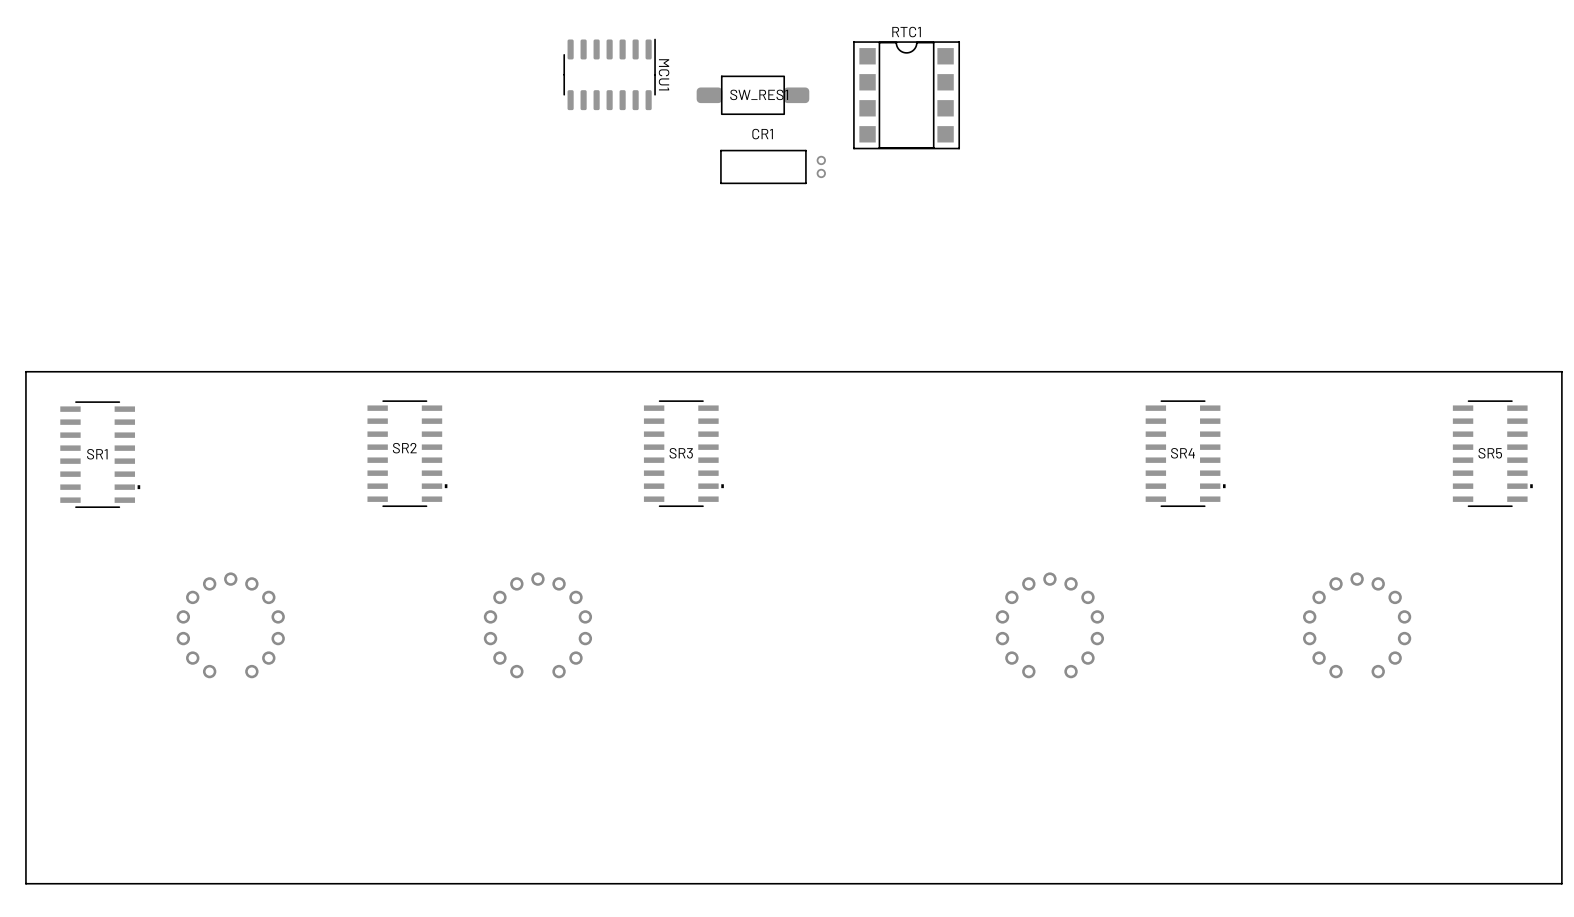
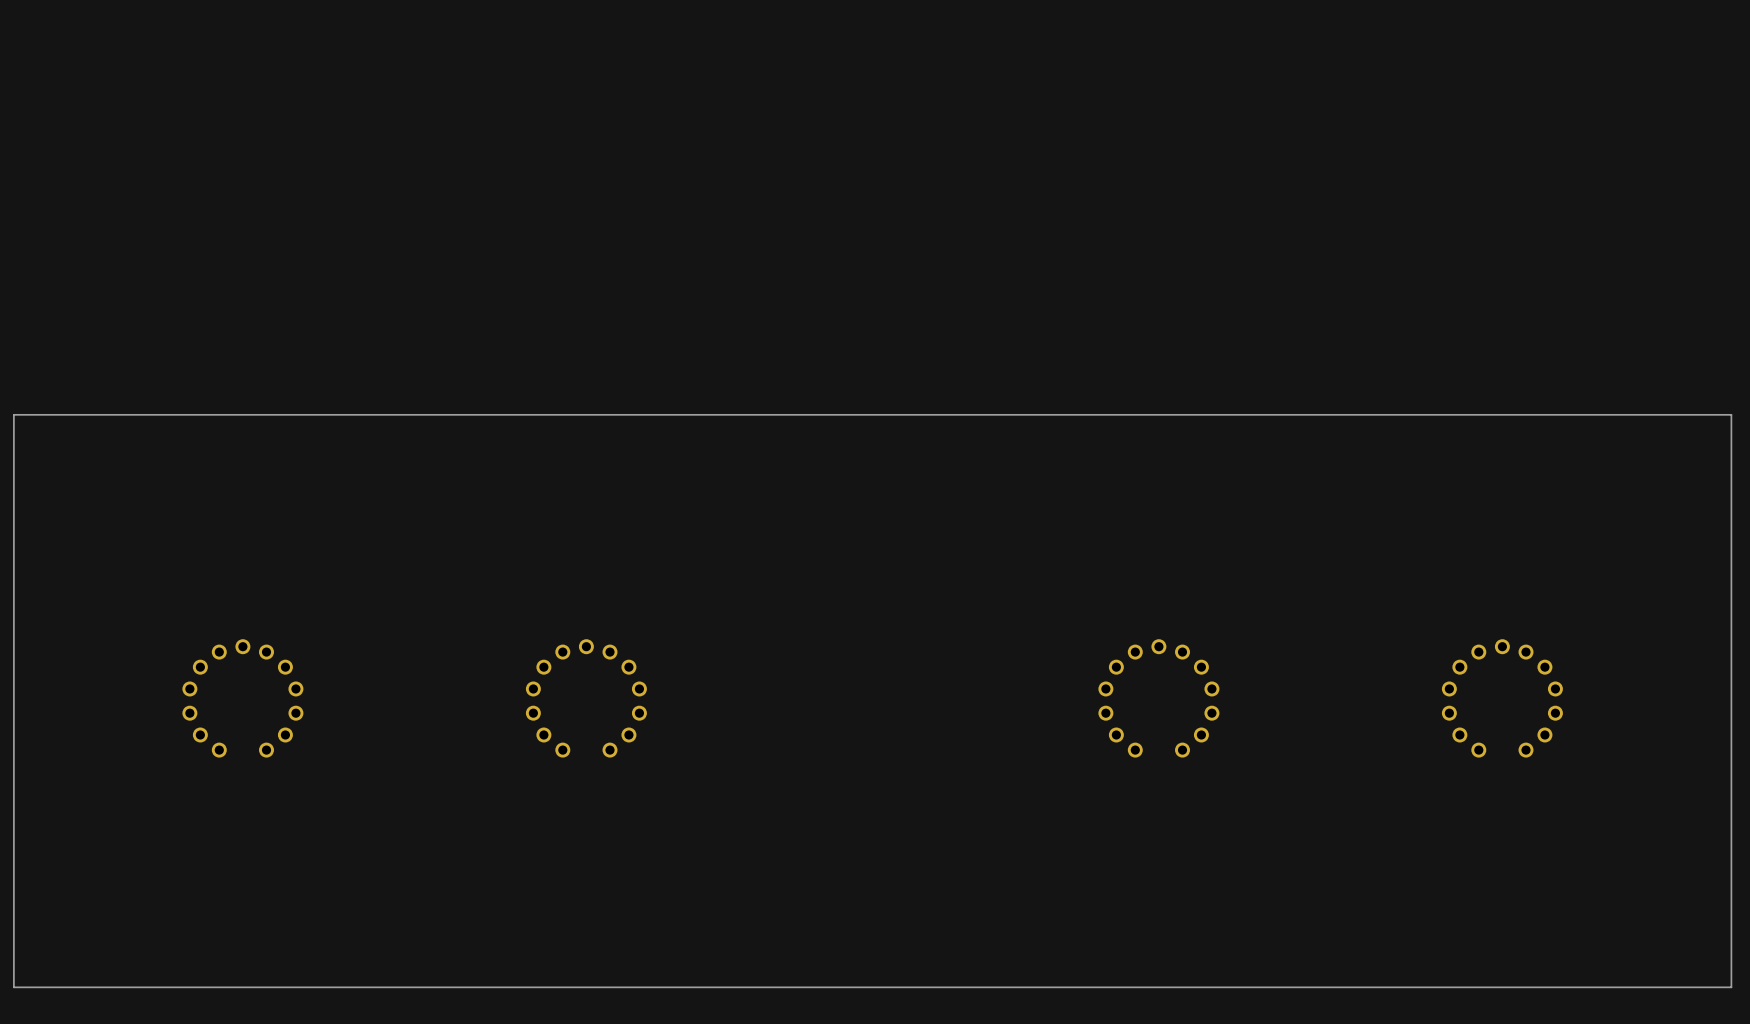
MCU1: (609, 74) -> none
SW_RES1: (752, 95) -> none
RTC1: (906, 95) -> none
CR1: (773, 166) -> none
SR2: (407, 453) -> none
SR3: (683, 453) -> none
SR4: (1185, 453) -> none
SR5: (1492, 453) -> none
SR1: (100, 454) -> none

